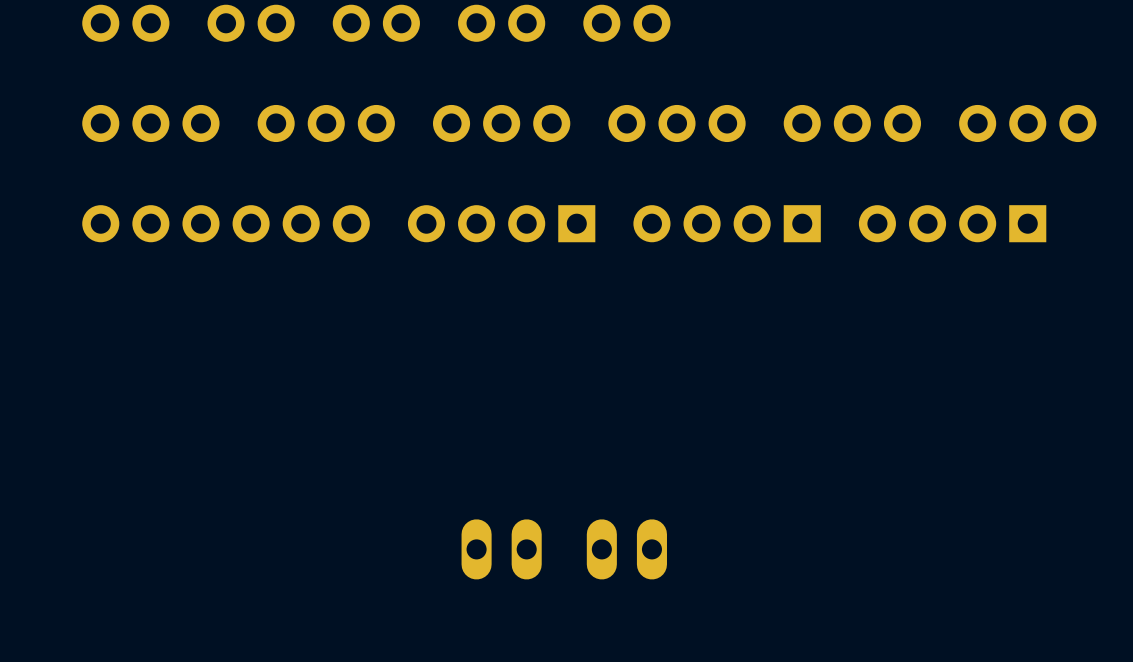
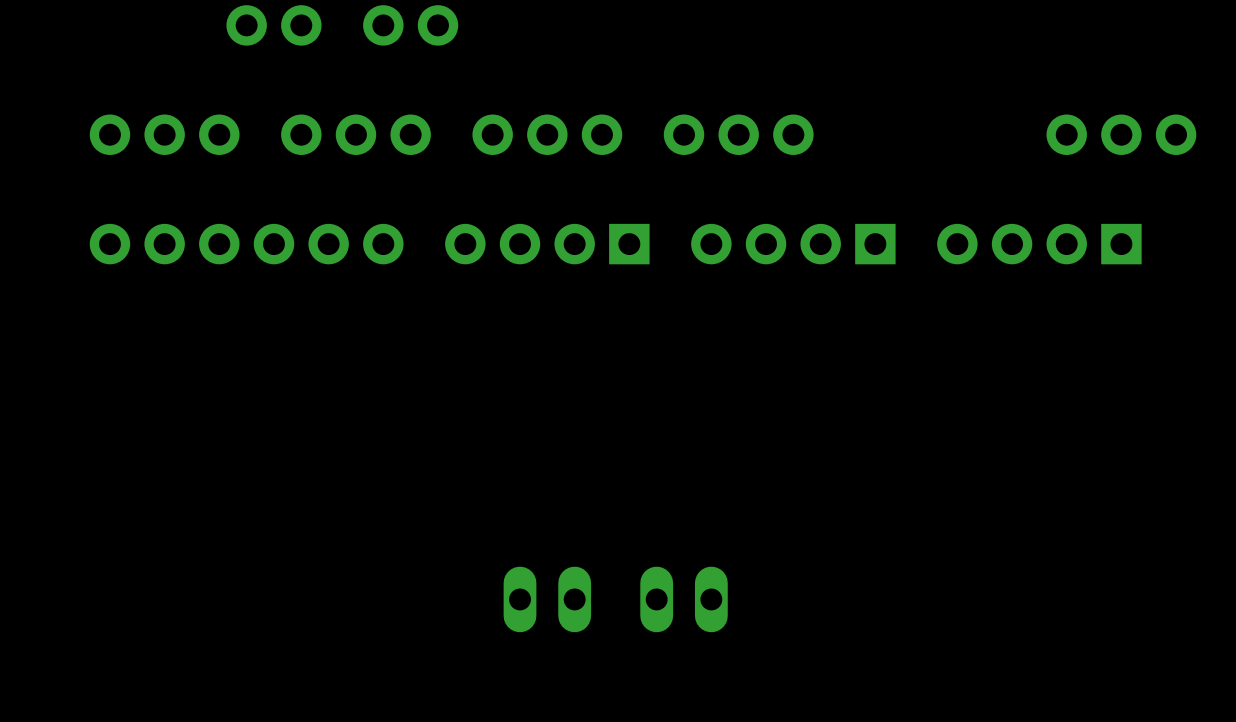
part: (125, 23) -> none
part: (501, 23) -> none
part: (626, 23) -> none
part: (852, 123) -> none

